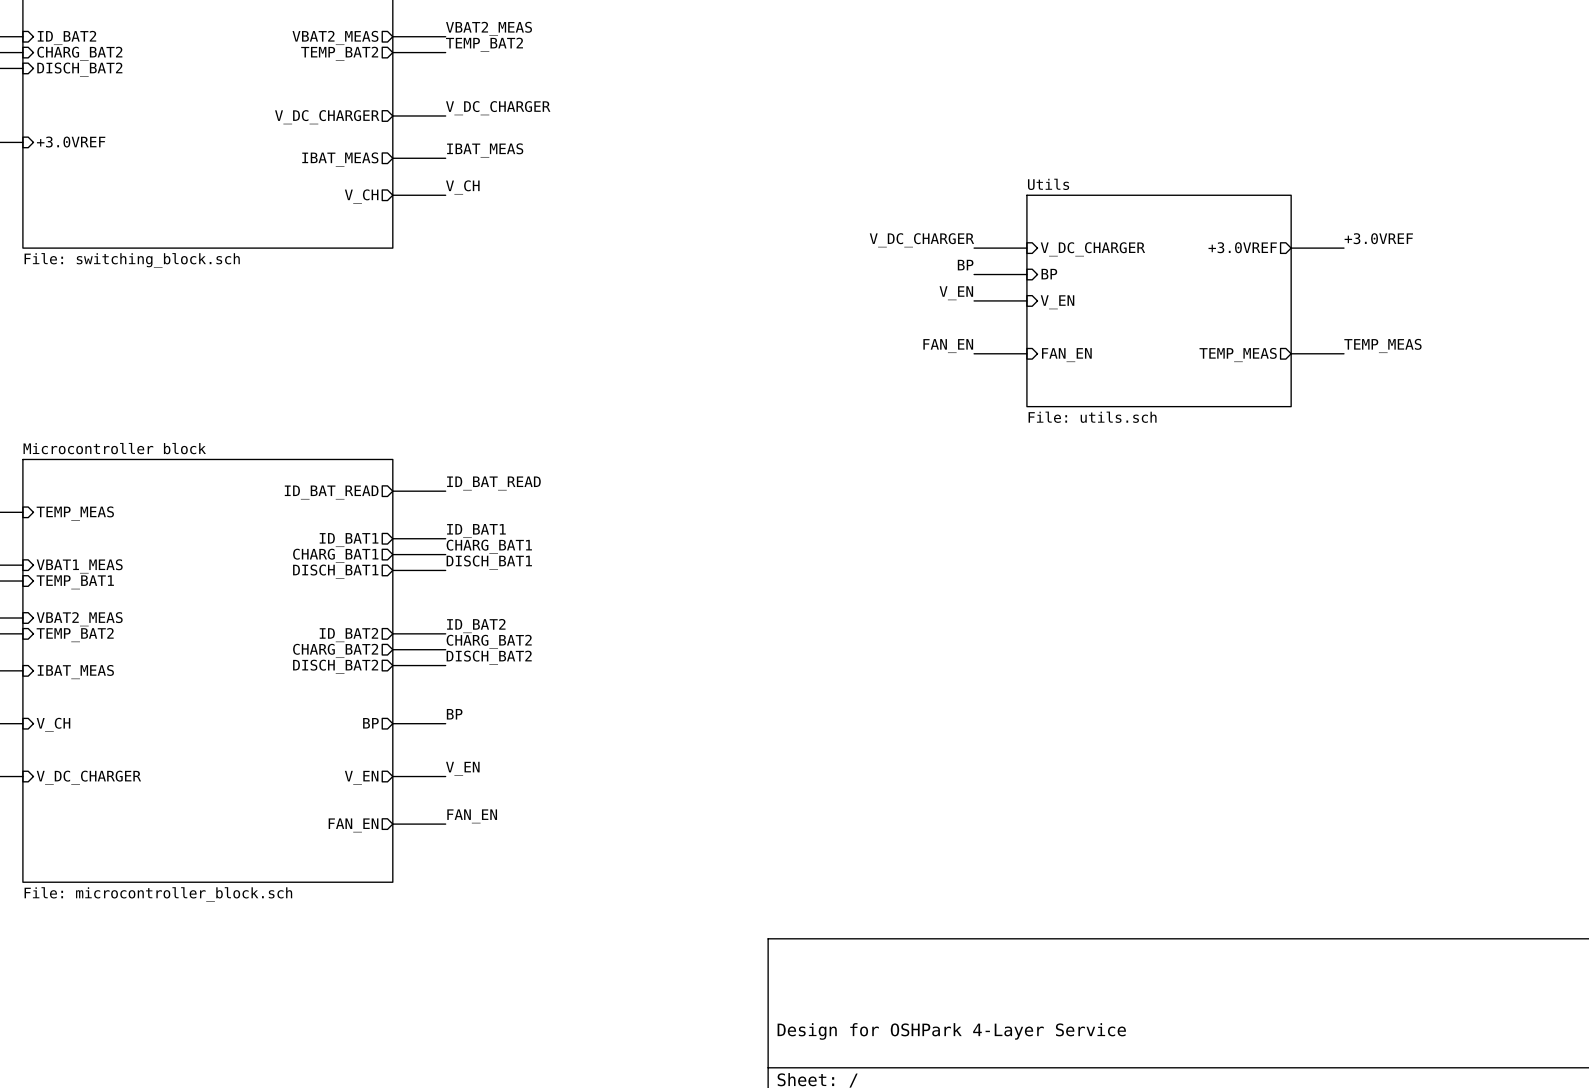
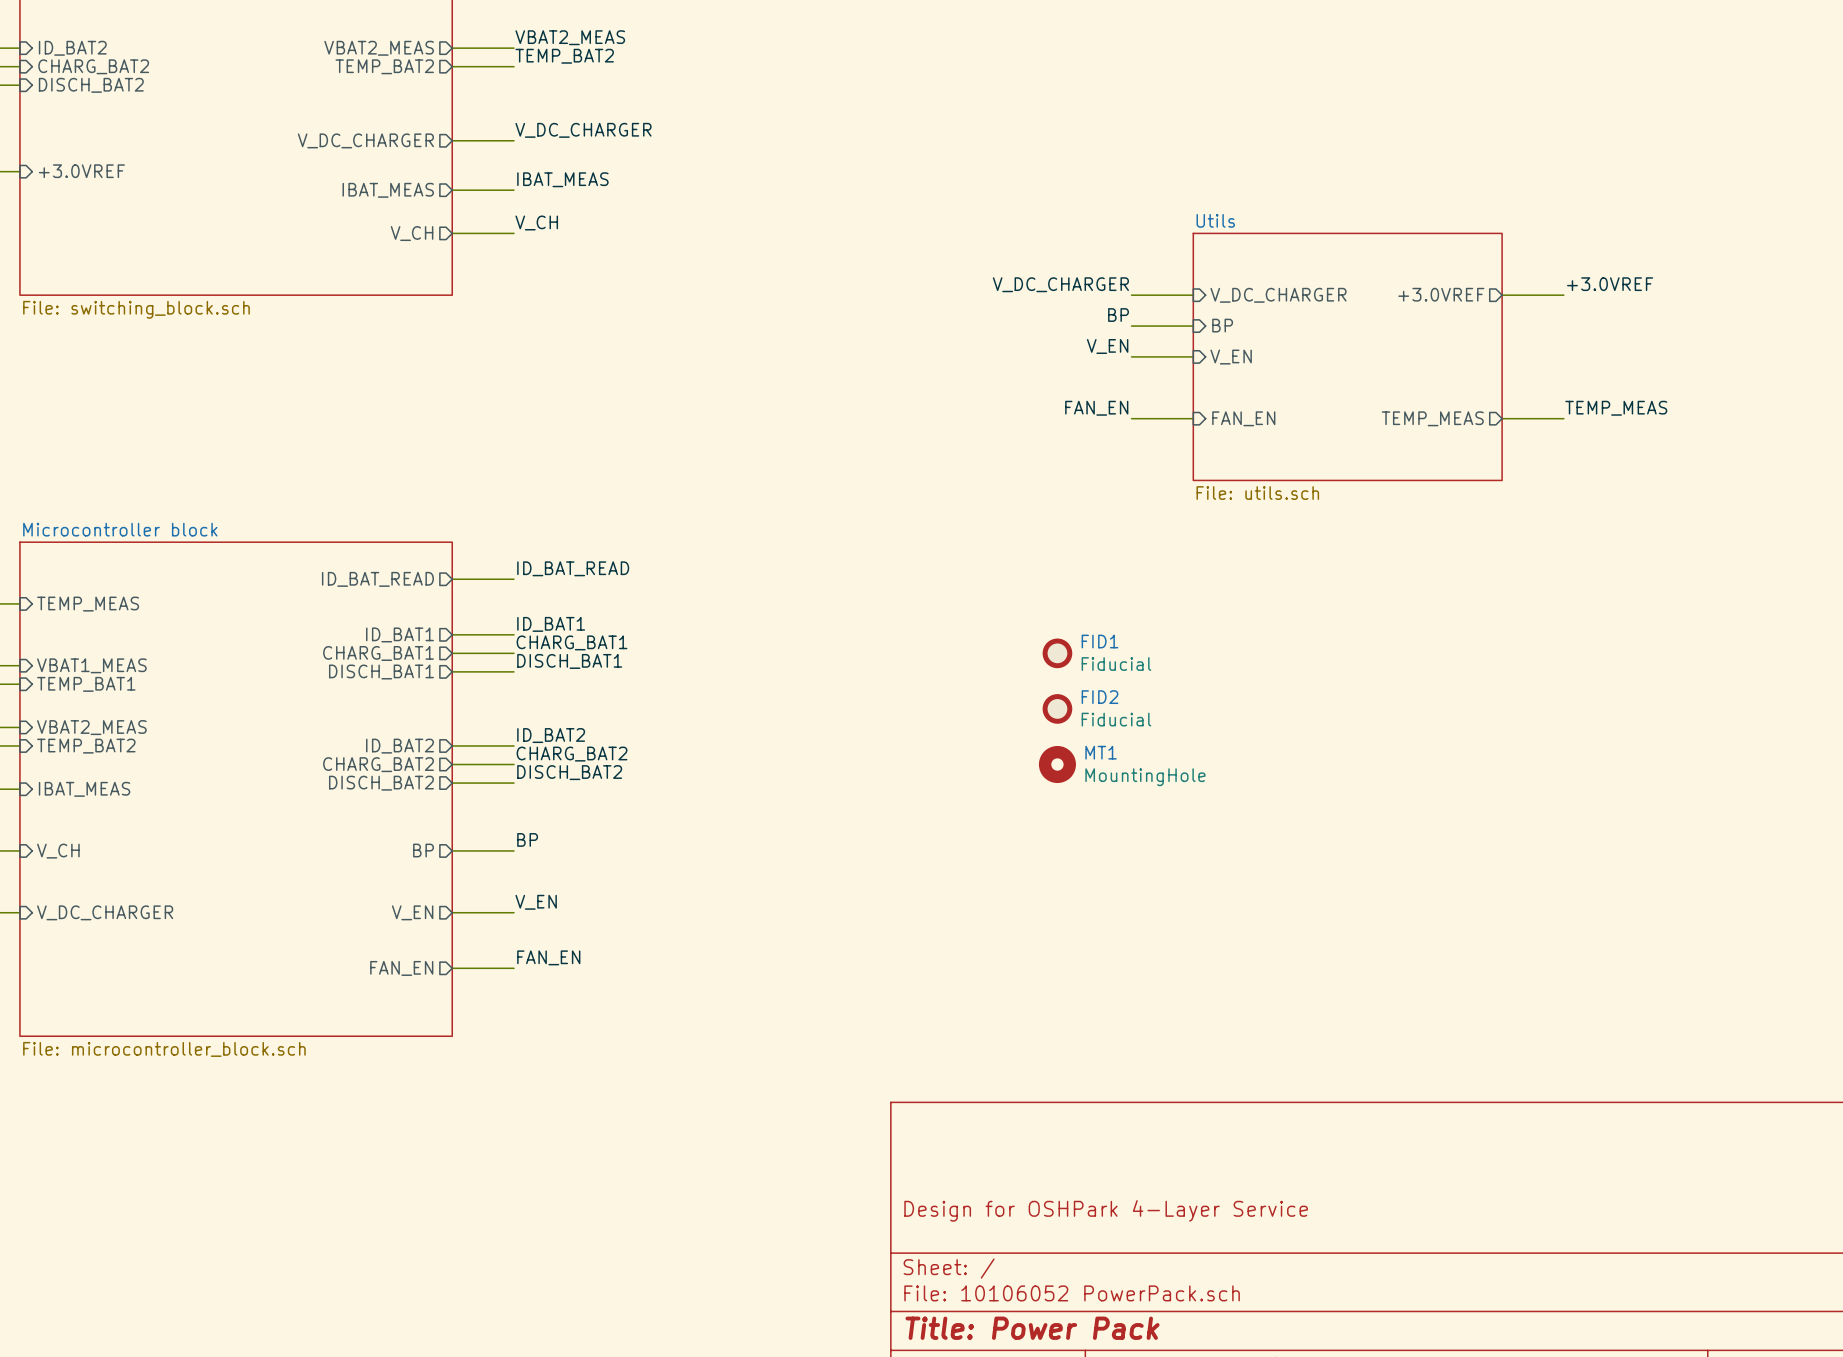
FID1: none -> Fiducial (1057, 653)
FID2: none -> Fiducial (1057, 708)
MT1: none -> MountingHole (1057, 764)

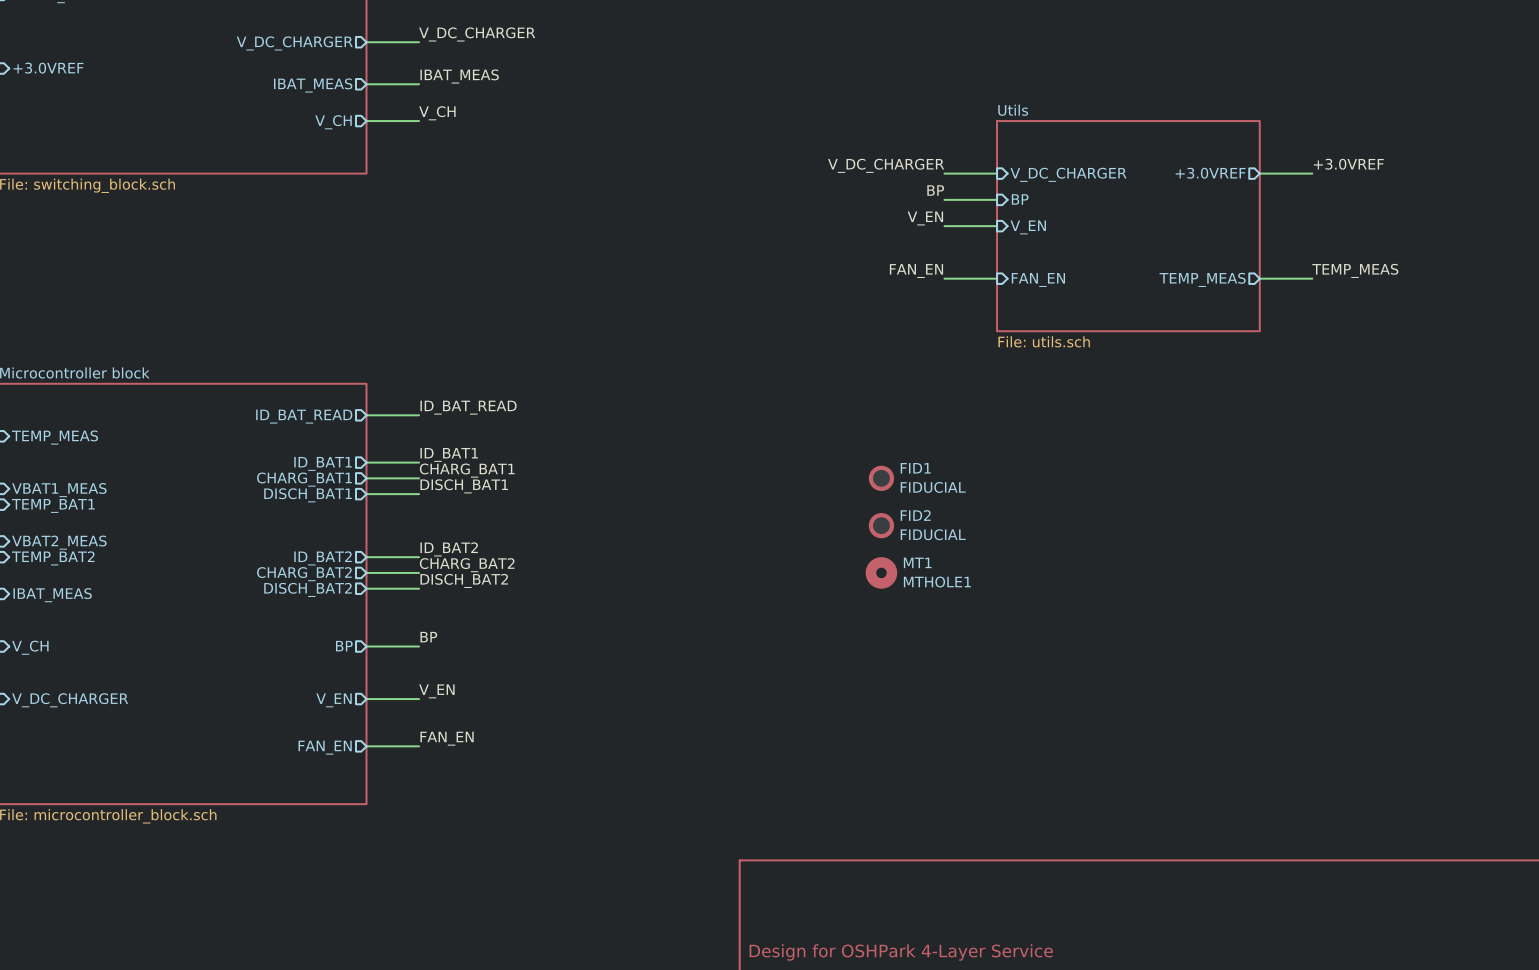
FID1 value: Fiducial (1116, 664) -> FIDUCIAL (933, 487)
FID2 value: Fiducial (1116, 719) -> FIDUCIAL (933, 534)
MT1 value: MountingHole (1145, 777) -> MTHOLE1 (937, 582)

